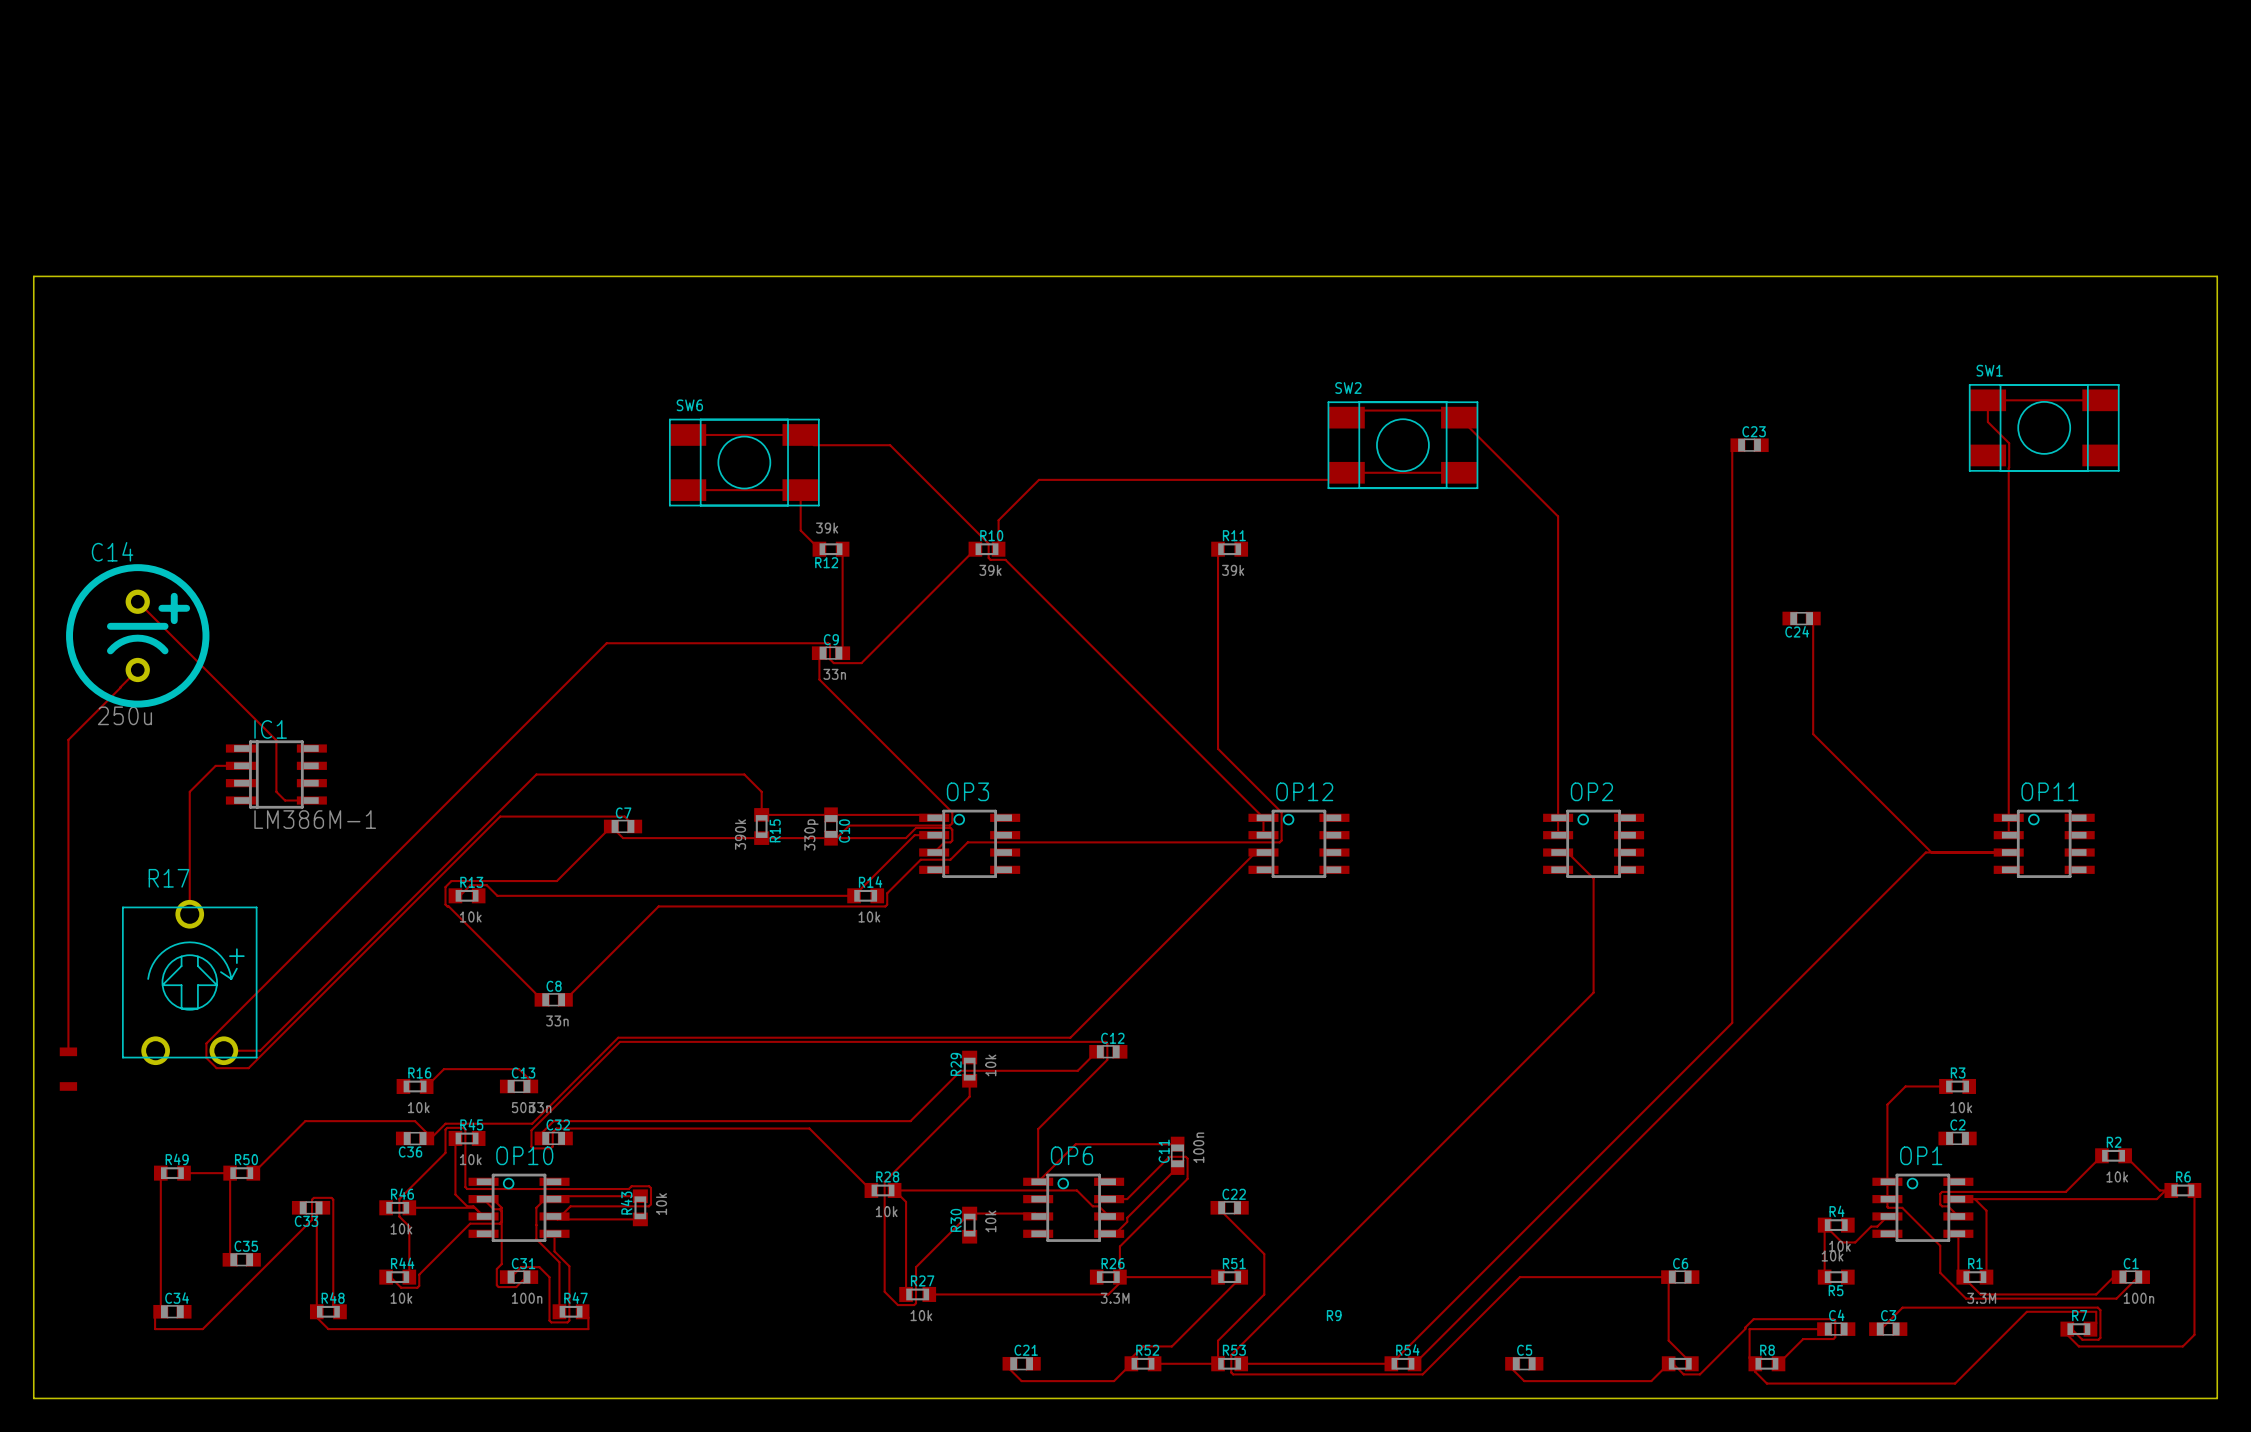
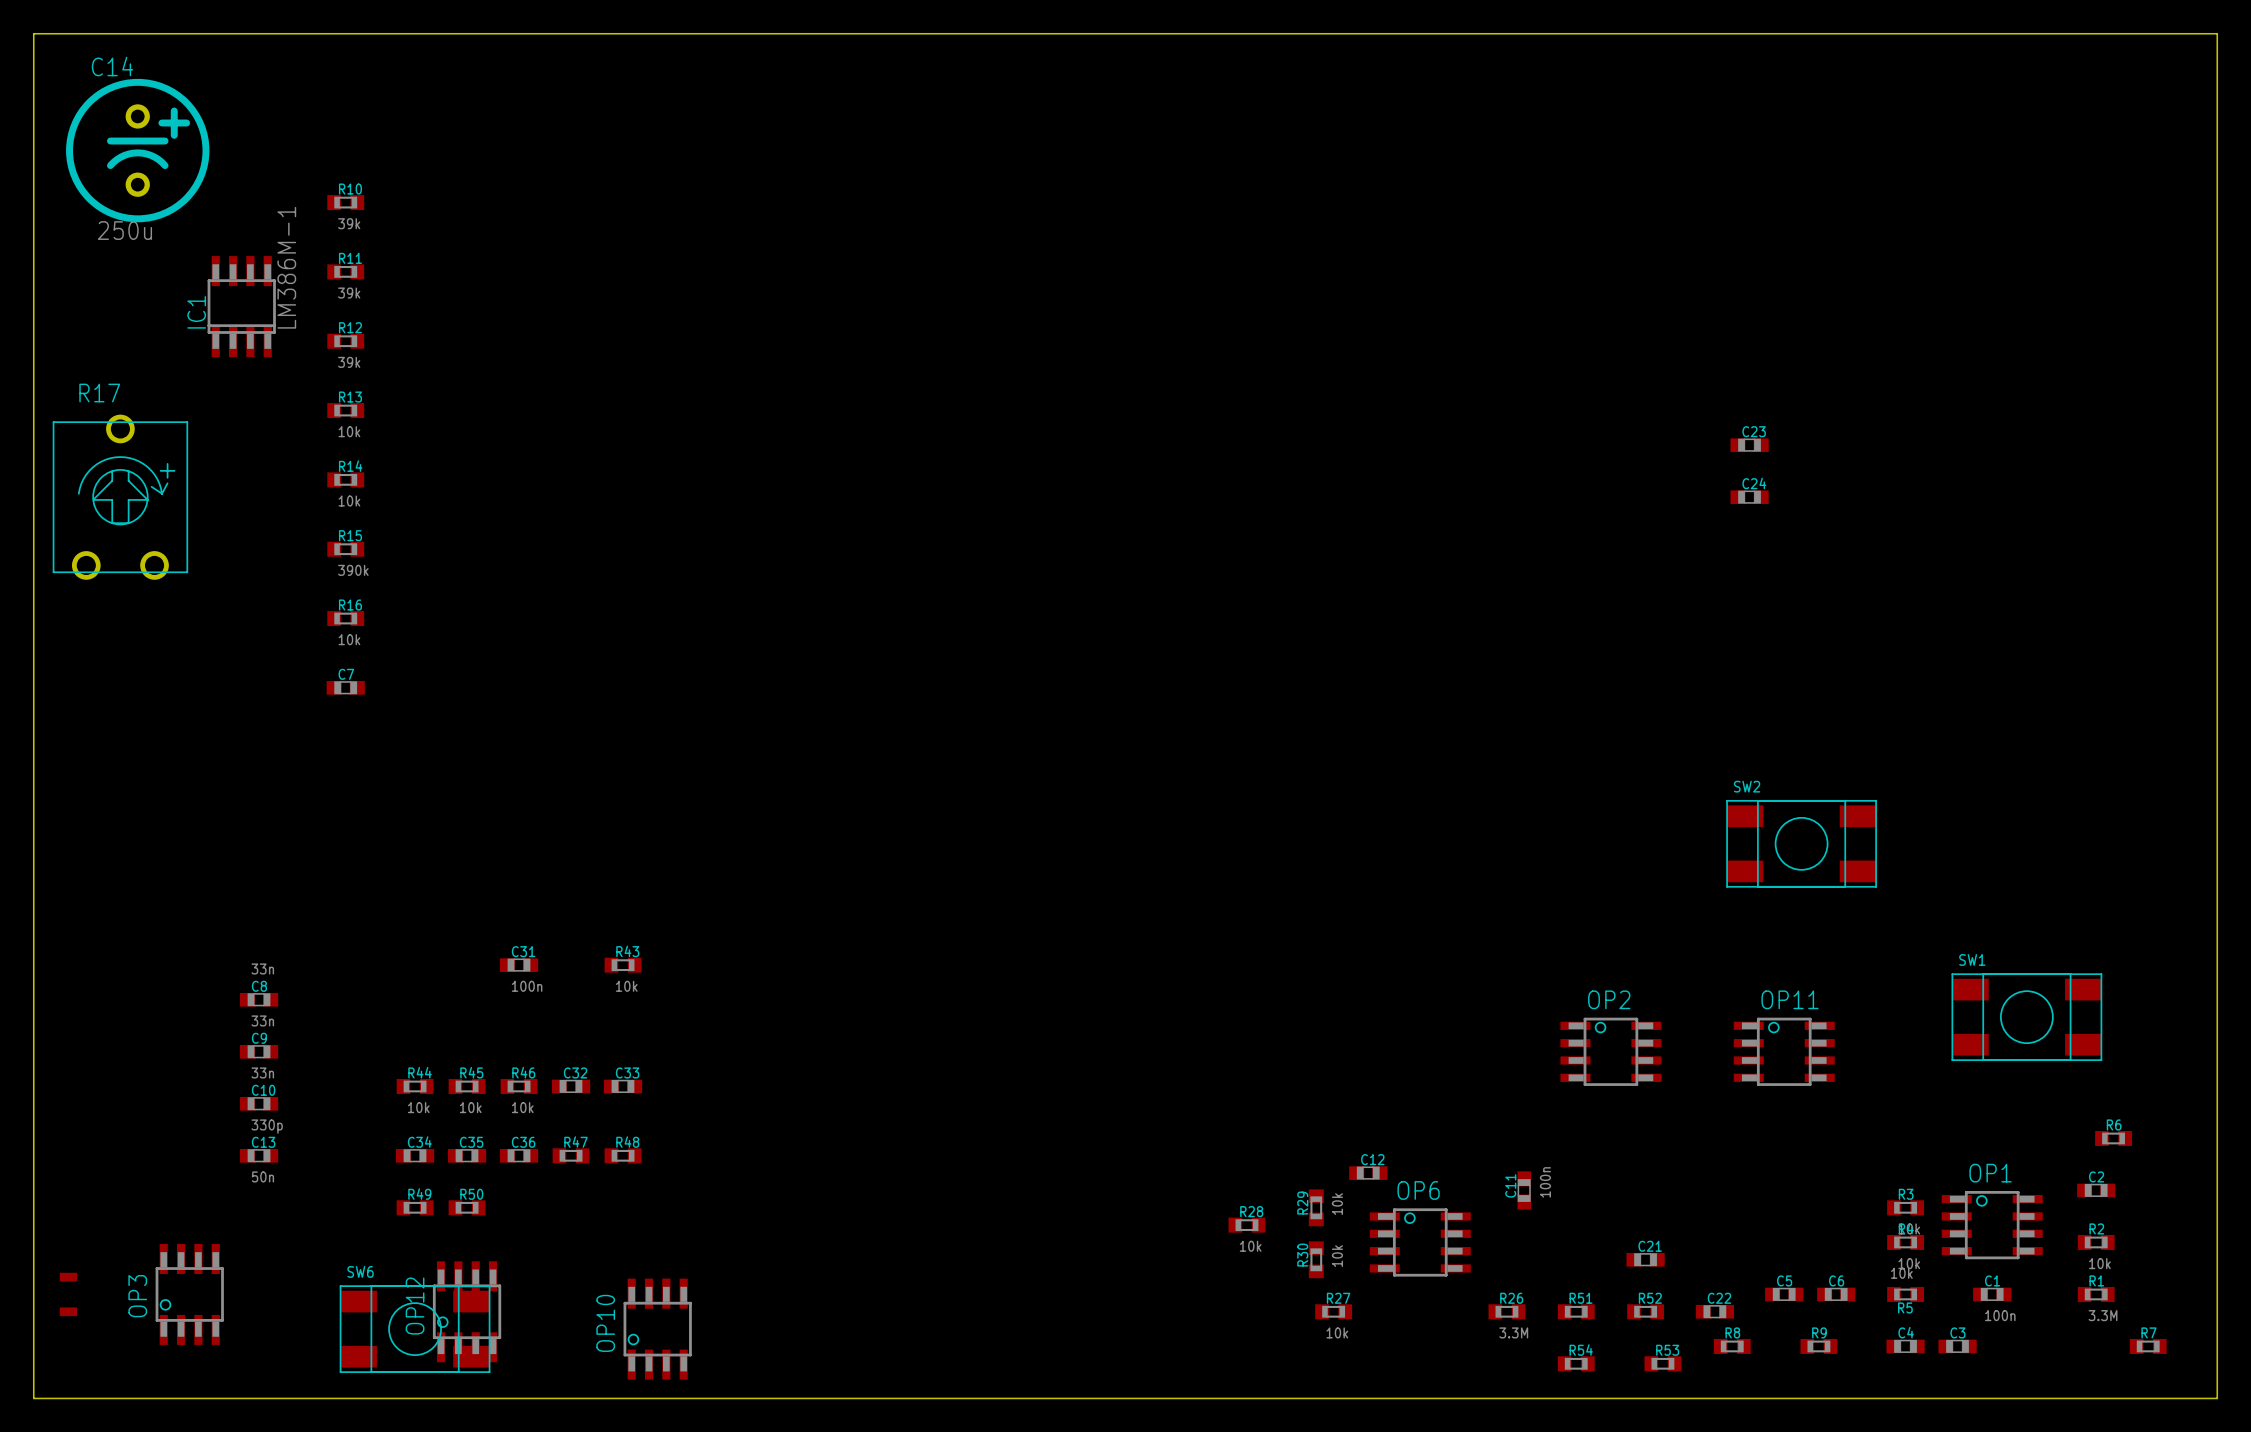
board edge: (33, 276) (2217, 276) -> (33, 276) (33, 33) (2217, 33) (2217, 276)
track: (1992, 393) (1999, 400) (2100, 400) -> none
track: (1987, 400) (1987, 422) (2009, 443) (2008, 835) -> none
track: (1472, 410) (1353, 410) (1346, 417) -> none
track: (1459, 417) (1558, 516) (1558, 835) -> none
SW1 position: (2044, 427) -> (2026, 1017)
track: (688, 434) (800, 434) -> none
track: (813, 445) (890, 445) (988, 543) (988, 558) (990, 559) (1005, 559) (1263, 817) (1263, 835) -> none
SW2 position: (1402, 445) -> (1801, 843)
track: (1737, 445) (1732, 450) (1732, 1022) (1391, 1363) (1241, 1363) -> none
SW6 position: (744, 462) -> (415, 1329)
track: (1346, 472) (1459, 472) -> none
track: (1350, 479) (1038, 479) (998, 520) (998, 549) -> none
track: (692, 497) (699, 490) (800, 490) (800, 530) (819, 549) -> none
R12 value position: 39k (827, 528) -> 39k (349, 362)
R12 position: (831, 549) -> (345, 341)
track: (842, 549) (842, 653) -> none
track: (975, 549) (861, 663) (833, 663) (830, 659) (830, 645) (828, 643) (606, 643) (206, 1043) (206, 1057) (216, 1068) (248, 1068) (500, 816) (624, 816) (634, 826) -> none
R10 position: (986, 549) -> (345, 202)
track: (1218, 549) (1218, 748) (1281, 812) (1281, 840) (1279, 842) (967, 842) (950, 859) (920, 859) (887, 893) (887, 904) (885, 906) (658, 906) (565, 999) -> none
R11 position: (1229, 549) -> (345, 271)
R12 name position: R12 (826, 562) -> R12 (350, 327)
track: (137, 601) (276, 740) (276, 791) (285, 800) (311, 800) -> none
R16: none -> 10k (345, 618)
C24 position: (1801, 618) -> (1749, 497)
track: (1813, 618) (1813, 734) (1931, 852) -> none
C24 name position: C24 (1797, 631) -> C24 (1754, 483)
C14 position: (137, 635) -> (137, 150)
track: (819, 653) (819, 679) (952, 812) (952, 823) (950, 825) (849, 825) (831, 843) (831, 838) -> none
C9 position: (831, 653) -> (259, 1051)
track: (137, 669) (68, 739) (68, 1051) -> none
track: (240, 765) (215, 765) (189, 791) (189, 914) -> none
IC1 rotation: 0° (276, 774) -> 90° counterclockwise (241, 306)
IC1 position: (276, 774) -> (241, 306)
track: (934, 817) (931, 814) (761, 814) (761, 791) (744, 774) (536, 774) (260, 1050) (223, 1050) -> none
C7 position: (623, 826) -> (345, 687)
R15 rotation: 0° (761, 826) -> 90° clockwise (345, 549)
R15 position: (761, 826) -> (345, 549)
C10 rotation: 0° (831, 826) -> 90° clockwise (259, 1103)
C10 position: (831, 826) -> (259, 1103)
R15 value position: 390k (740, 834) -> 390k (353, 570)
C10 value position: 330p (811, 834) -> 330p (267, 1126)
track: (934, 835) (914, 835) (854, 895) (497, 895) (486, 885) (470, 885) (459, 895) (455, 895) -> none
OP3 rotation: 0° (969, 843) -> 90° counterclockwise (189, 1294)
OP3 position: (969, 843) -> (189, 1294)
OP12 rotation: 0° (1298, 843) -> 90° counterclockwise (467, 1311)
OP12 position: (1298, 843) -> (467, 1311)
OP2 position: (1593, 843) -> (1610, 1051)
OP11 position: (2044, 843) -> (1784, 1051)
track: (934, 852) (944, 842) (952, 840) (952, 829) (950, 827) (916, 827) (905, 838) (623, 838) (611, 826) (556, 881) (451, 881) (445, 887) (445, 904) (542, 999) -> none
track: (1263, 852) (1255, 852) (1070, 1037) (618, 1037) (532, 1123) (445, 1123) (430, 1138) (426, 1138) (426, 1132) (415, 1121) (305, 1121) (253, 1173) -> none
track: (1558, 852) (1567, 852) (1593, 878) (1593, 992) (1231, 1354) (1231, 1372) (1233, 1374) (1422, 1374) (1519, 1277) (1668, 1277) (1668, 1340) (1691, 1363) -> none
track: (2008, 852) (1925, 852) (1414, 1363) -> none
R13 position: (467, 895) -> (345, 410)
R14 position: (865, 895) -> (345, 479)
R17 position: (189, 982) -> (120, 497)
C8 position: (553, 999) -> (259, 999)
track: (1096, 1051) (1077, 1070) (960, 1070) (910, 1121) (553, 1121) (542, 1132) (542, 1138) -> none
C12 position: (1108, 1051) -> (1368, 1173)
part position: (68, 1069) -> (68, 1294)
R29 position: (969, 1069) -> (1316, 1207)
R16 name: R16 (419, 1072) -> R44 (420, 1072)
track: (969, 1080) (969, 1096) (884, 1181) (884, 1291) (897, 1305) (914, 1305) (916, 1303) (916, 1267) (969, 1213) (1035, 1213) (1038, 1216) -> none
track: (426, 1086) (443, 1069) (519, 1069) (530, 1080) (530, 1086) -> none
C13 position: (519, 1086) -> (259, 1155)
track: (1945, 1086) (1905, 1086) (1887, 1104) (1887, 1206) (1902, 1207) (1940, 1245) (1940, 1272) (1966, 1298) (2116, 1298) (2138, 1277) (2142, 1277) -> none
R3 position: (1957, 1086) -> (1905, 1207)
C36 position: (415, 1138) -> (519, 1155)
track: (455, 1138) (455, 1194) (467, 1206) (473, 1206) (483, 1216) -> none
R45 position: (467, 1138) -> (467, 1086)
C32 position: (553, 1138) -> (571, 1086)
C2 position: (1957, 1138) -> (2096, 1190)
track: (1177, 1144) (1075, 1144) (1038, 1181) (1038, 1129) (1107, 1059) (1107, 1043) (1105, 1041) (619, 1041) (531, 1130) (531, 1146) (533, 1148) (550, 1148) (552, 1146) (552, 1132) (556, 1128) (809, 1128) (871, 1190) -> none
C36 name position: C36 (410, 1151) -> C36 (523, 1142)
C11 position: (1177, 1155) -> (1524, 1190)
track: (2101, 1155) (2065, 1191) (1942, 1191) (1940, 1193) (1940, 1204) (1948, 1206) (1958, 1216) -> none
R2 position: (2113, 1155) -> (2096, 1242)
track: (2125, 1155) (2159, 1190) (2171, 1190) -> none
track: (1177, 1167) (1127, 1217) (1127, 1221) (1115, 1233) (1109, 1233) -> none
track: (160, 1173) (160, 1311) (155, 1317) (155, 1329) (202, 1329) (312, 1219) (312, 1199) (313, 1197) (331, 1197) (333, 1199) (333, 1305) (339, 1311) -> none
R49 position: (172, 1173) -> (415, 1207)
track: (184, 1173) (230, 1173) (230, 1259) -> none
R50 position: (241, 1173) -> (467, 1207)
R28 position: (883, 1190) -> (1246, 1225)
track: (2165, 1190) (2156, 1199) (1958, 1199) -> none
R6 position: (2182, 1190) -> (2113, 1138)
track: (2194, 1190) (2194, 1334) (2182, 1346) (2078, 1346) (2067, 1334) (2067, 1329) (2071, 1329) (2082, 1339) (2098, 1339) (2100, 1337) (2100, 1310) (2097, 1307) (1902, 1307) (1881, 1329) (1876, 1329) -> none
track: (640, 1196) (557, 1196) (554, 1199) (545, 1199) (536, 1207) (536, 1239) (559, 1262) (559, 1311) -> none
track: (1109, 1199) (1127, 1199) (1169, 1156) (1185, 1156) (1187, 1158) (1187, 1178) (1119, 1246) (1119, 1277) (1218, 1277) -> none
track: (1974, 1199) (1986, 1210) (1986, 1277) -> none
C33 position: (311, 1207) -> (623, 1086)
track: (322, 1207) (316, 1213) (316, 1317) (328, 1329) (588, 1329) (588, 1317) (582, 1311) -> none
R46 position: (397, 1207) -> (519, 1086)
track: (409, 1207) (474, 1207) -> none
OP10 rotation: 0° (519, 1207) -> 90° counterclockwise (657, 1329)
OP10 position: (519, 1207) -> (657, 1329)
R43 rotation: 0° (640, 1207) -> 90° clockwise (623, 965)
R43 position: (640, 1207) -> (623, 965)
OP6 position: (1073, 1207) -> (1420, 1242)
track: (1218, 1207) (1264, 1254) (1264, 1294) (1218, 1340) (1218, 1363) (1154, 1363) -> none
C22 position: (1229, 1207) -> (1714, 1311)
OP1 position: (1922, 1207) -> (1992, 1225)
track: (501, 1211) (493, 1209) (483, 1199) (493, 1199) (501, 1207) (501, 1264) (496, 1269) (496, 1285) (498, 1287) (516, 1287) (526, 1277) (530, 1277) -> none
track: (1109, 1216) (1099, 1206) (1092, 1206) (1076, 1190) (894, 1190) (906, 1201) (906, 1294) -> none
track: (1887, 1216) (1877, 1226) (1871, 1226) (1855, 1242) (1841, 1242) (1824, 1225) (1824, 1277) -> none
track: (557, 1219) (640, 1219) -> none
track: (557, 1219) (570, 1206) (648, 1206) (650, 1204) (650, 1188) (649, 1186) (631, 1186) (628, 1189) (467, 1189) (465, 1187) (465, 1129) (463, 1127) (447, 1127) (445, 1129) (445, 1152) (399, 1199) (399, 1216) (409, 1226) (409, 1277) -> none
C33 name position: C33 (306, 1221) -> C33 (627, 1072)
track: (501, 1221) (499, 1223) (470, 1223) (419, 1274) (419, 1285) (417, 1287) (401, 1287) (390, 1277) (386, 1277) -> none
R30 position: (969, 1225) -> (1316, 1259)
R4 position: (1836, 1225) -> (1905, 1242)
track: (554, 1233) (554, 1251) (569, 1266) (569, 1320) (567, 1322) (551, 1322) (549, 1320) (549, 1277) (539, 1267) (521, 1267) (511, 1277) (507, 1277) -> none
track: (1958, 1233) (1958, 1272) (1980, 1294) (2096, 1294) (2113, 1277) (2119, 1277) -> none
C35 position: (241, 1259) -> (467, 1155)
R44: 10k (397, 1277) -> none
C31 position: (519, 1277) -> (519, 965)
R26 position: (1108, 1277) -> (1506, 1311)
track: (1125, 1277) (1108, 1294) (929, 1294) -> none
R51 position: (1229, 1277) -> (1576, 1311)
track: (1241, 1277) (1171, 1346) (1142, 1346) (1131, 1358) (1131, 1363) (1114, 1381) (1021, 1381) (1010, 1369) (1010, 1363) -> none
C6 position: (1680, 1277) -> (1836, 1294)
R5 position: (1836, 1277) -> (1905, 1294)
R1 position: (1974, 1277) -> (2096, 1294)
C1 position: (2130, 1277) -> (1992, 1294)
R27 position: (917, 1294) -> (1333, 1311)
C34 position: (172, 1311) -> (415, 1155)
R48 position: (328, 1311) -> (623, 1155)
R47 position: (571, 1311) -> (571, 1155)
R9 name position: R9 (1334, 1315) -> R9 (1819, 1332)
track: (1824, 1329) (1749, 1329) (1749, 1358) (1755, 1363) (1755, 1371) (1766, 1383) (1955, 1383) (2026, 1311) (2096, 1311) (2096, 1323) (2090, 1329) -> none
C4 position: (1836, 1329) -> (1905, 1346)
C3 position: (1888, 1329) -> (1957, 1346)
R7 position: (2078, 1329) -> (2148, 1346)
C21 position: (1021, 1363) -> (1645, 1259)
R52 position: (1142, 1363) -> (1645, 1311)
R53 position: (1229, 1363) -> (1662, 1363)
R54 position: (1402, 1363) -> (1576, 1363)
track: (1512, 1363) (1512, 1369) (1524, 1381) (1651, 1381) (1668, 1363) (1673, 1363) (1683, 1374) (1699, 1374) (1753, 1319) (1833, 1319) (1835, 1321) (1835, 1337) (1833, 1339) (1803, 1339) (1778, 1363) -> none
C5 position: (1524, 1363) -> (1784, 1294)
R9 position: (1680, 1363) -> (1818, 1346)
R8 position: (1766, 1363) -> (1732, 1346)

